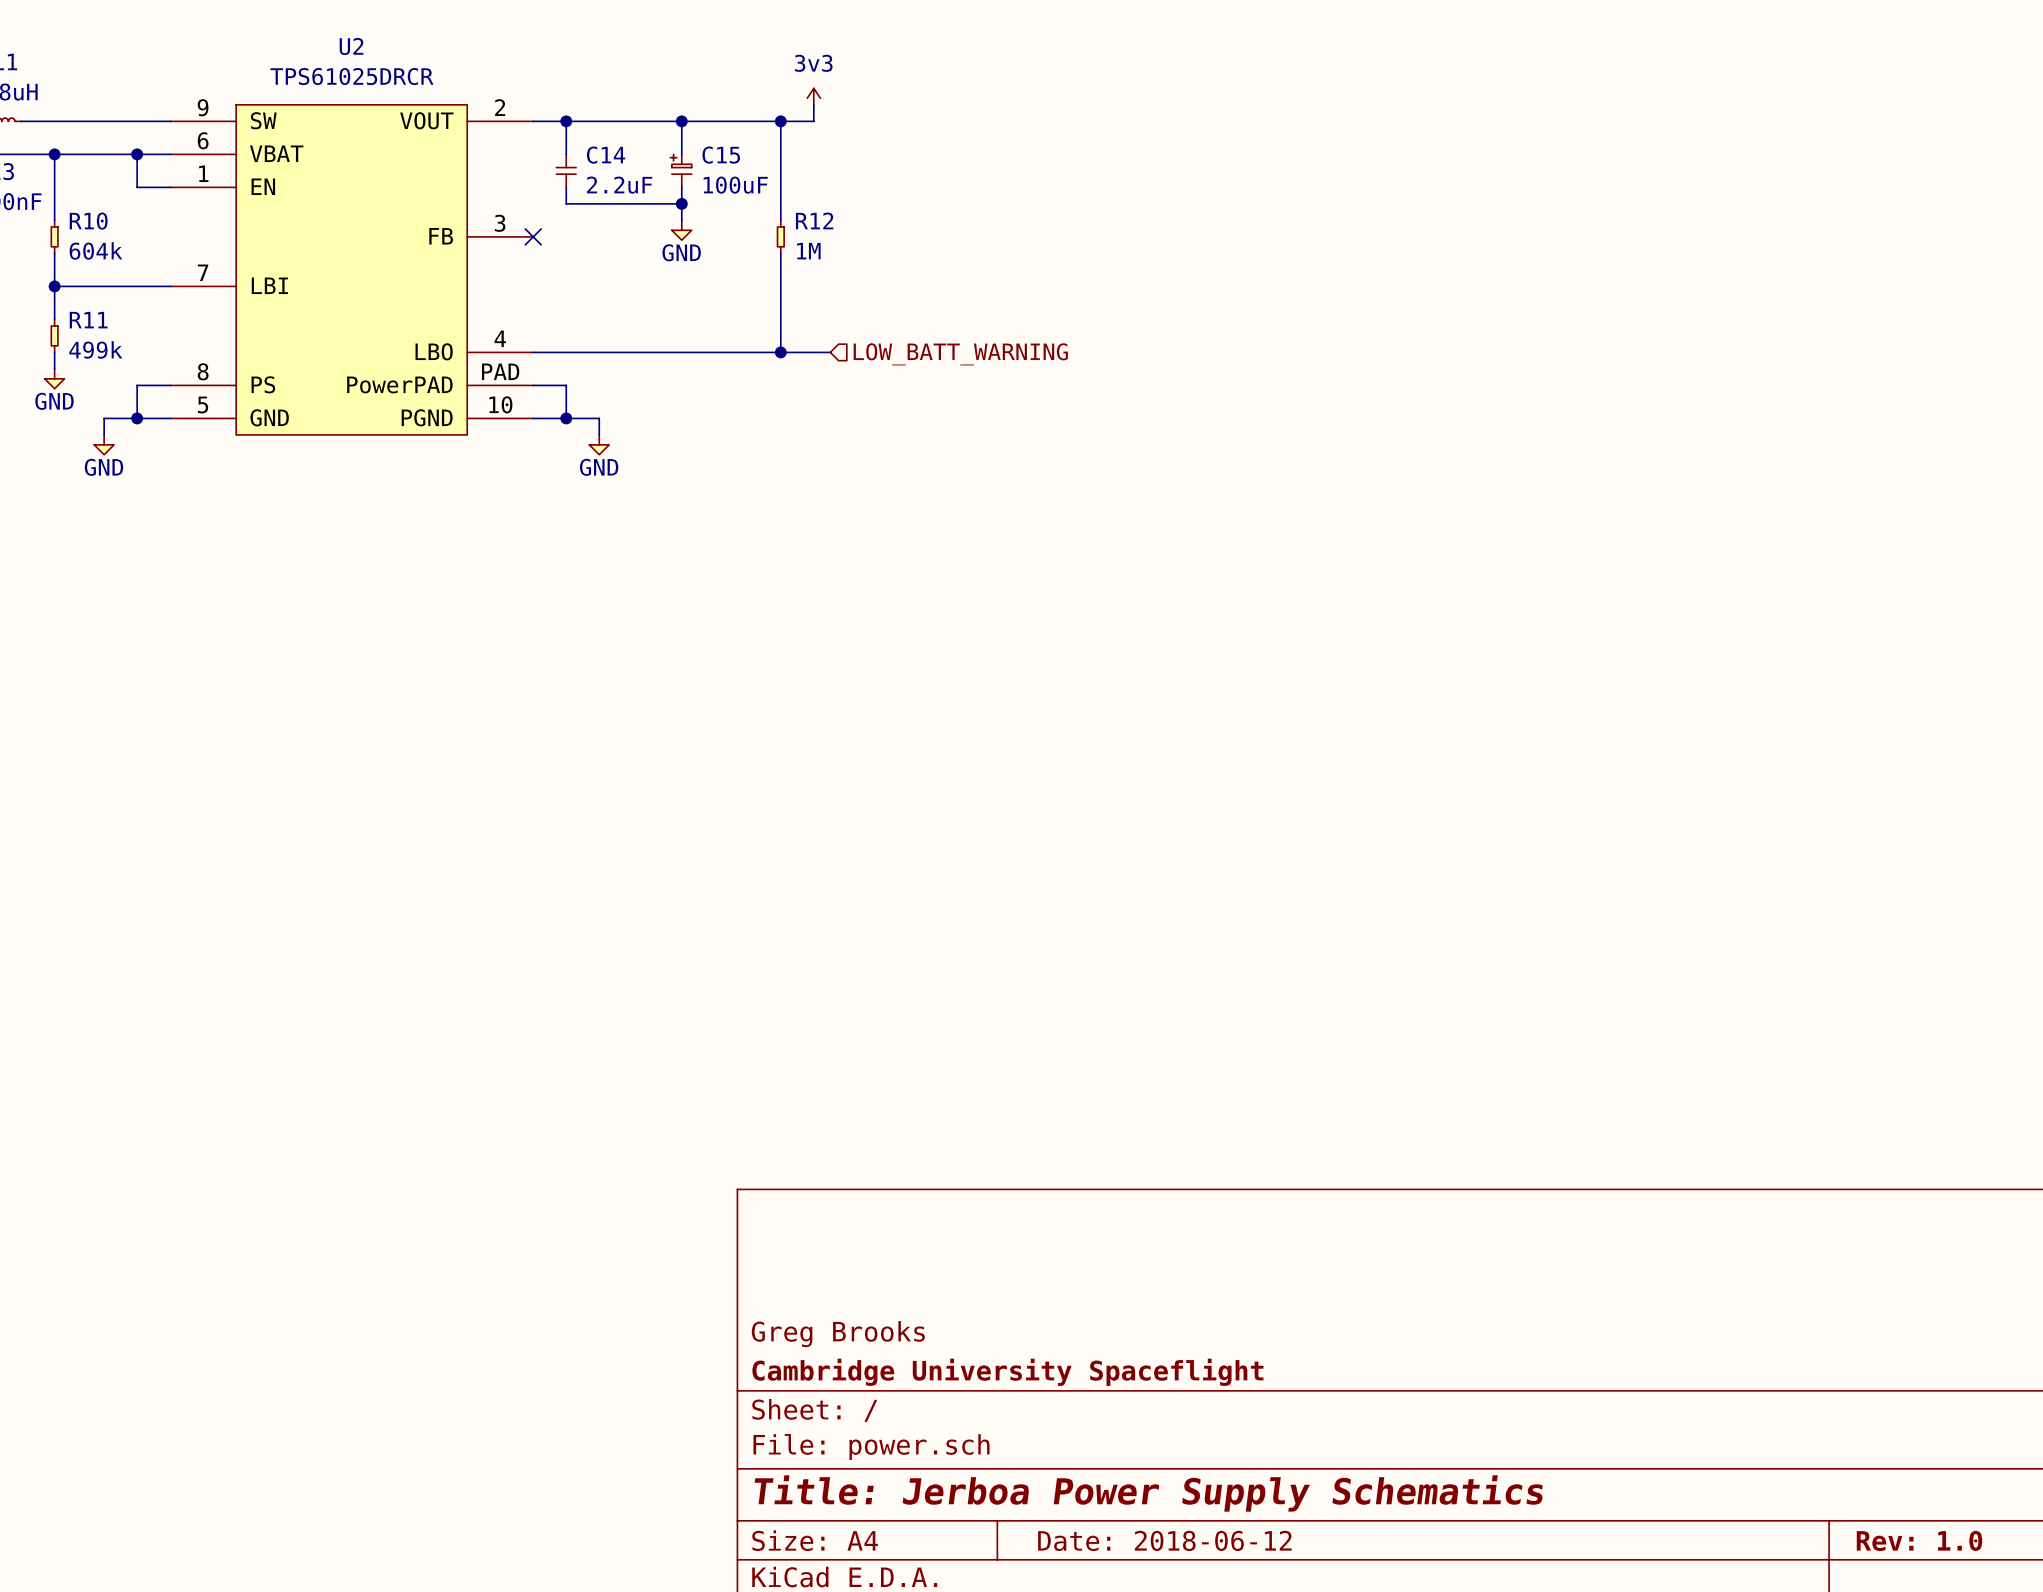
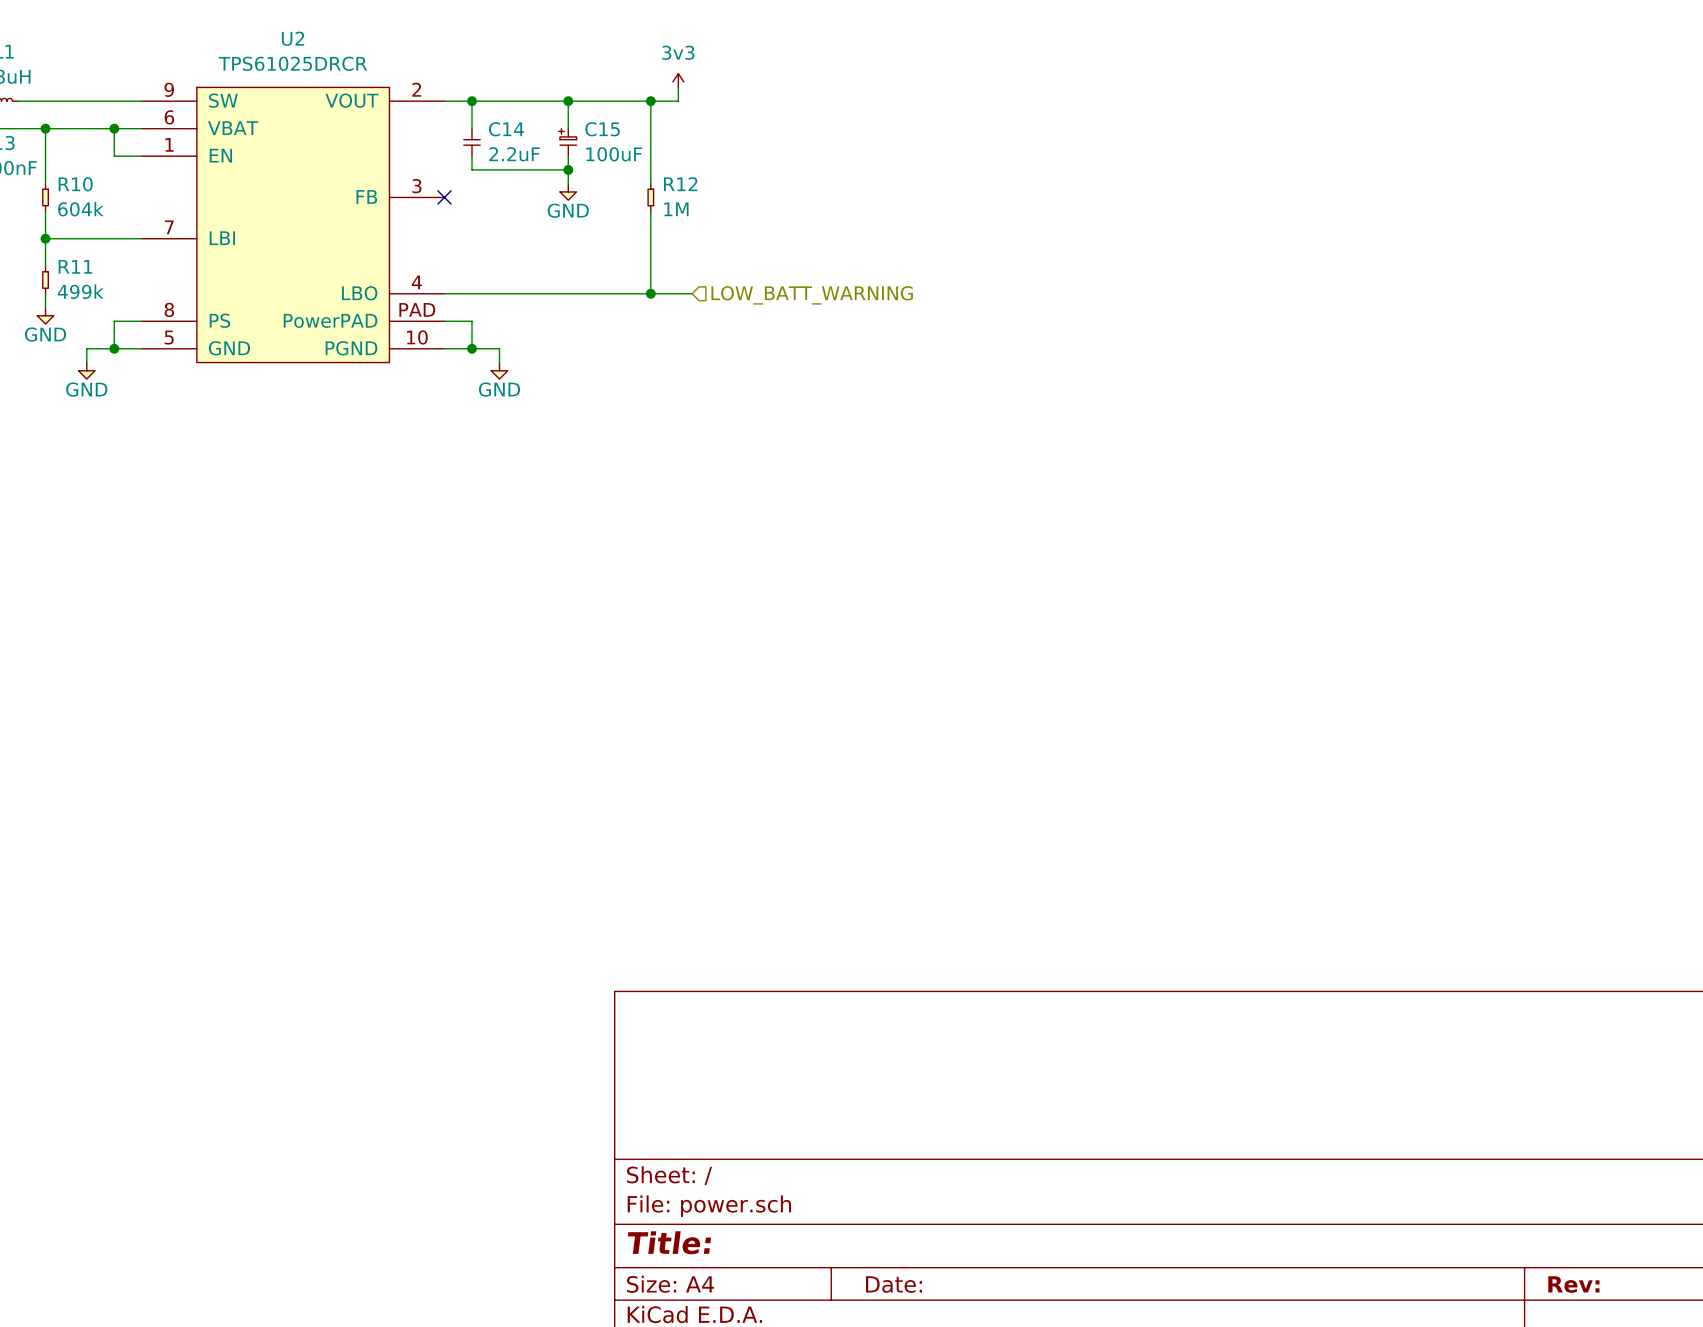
title block: Greg Brooks (838, 1334) -> none
title block: Cambridge University Spaceflight (1007, 1372) -> none
title block: Title: Jerboa Power Supply Schematics (1148, 1493) -> Title: (669, 1242)
title block: Date: 2018-06-12 (1164, 1540) -> Date: (894, 1284)
title block: Rev: 1.0 (1919, 1540) -> Rev: (1573, 1284)

